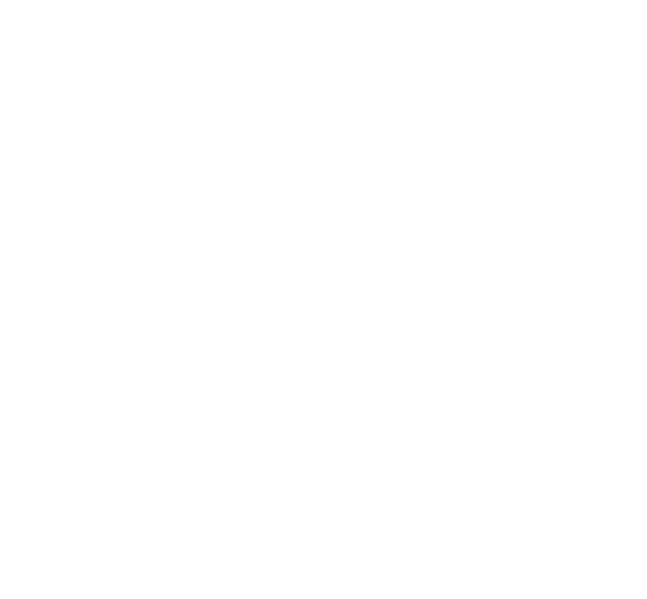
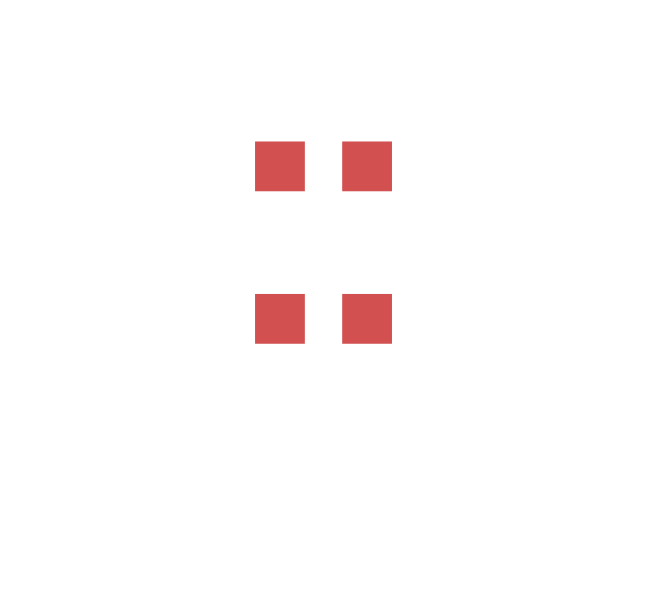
part: none -> (323, 166)
part: none -> (323, 318)

